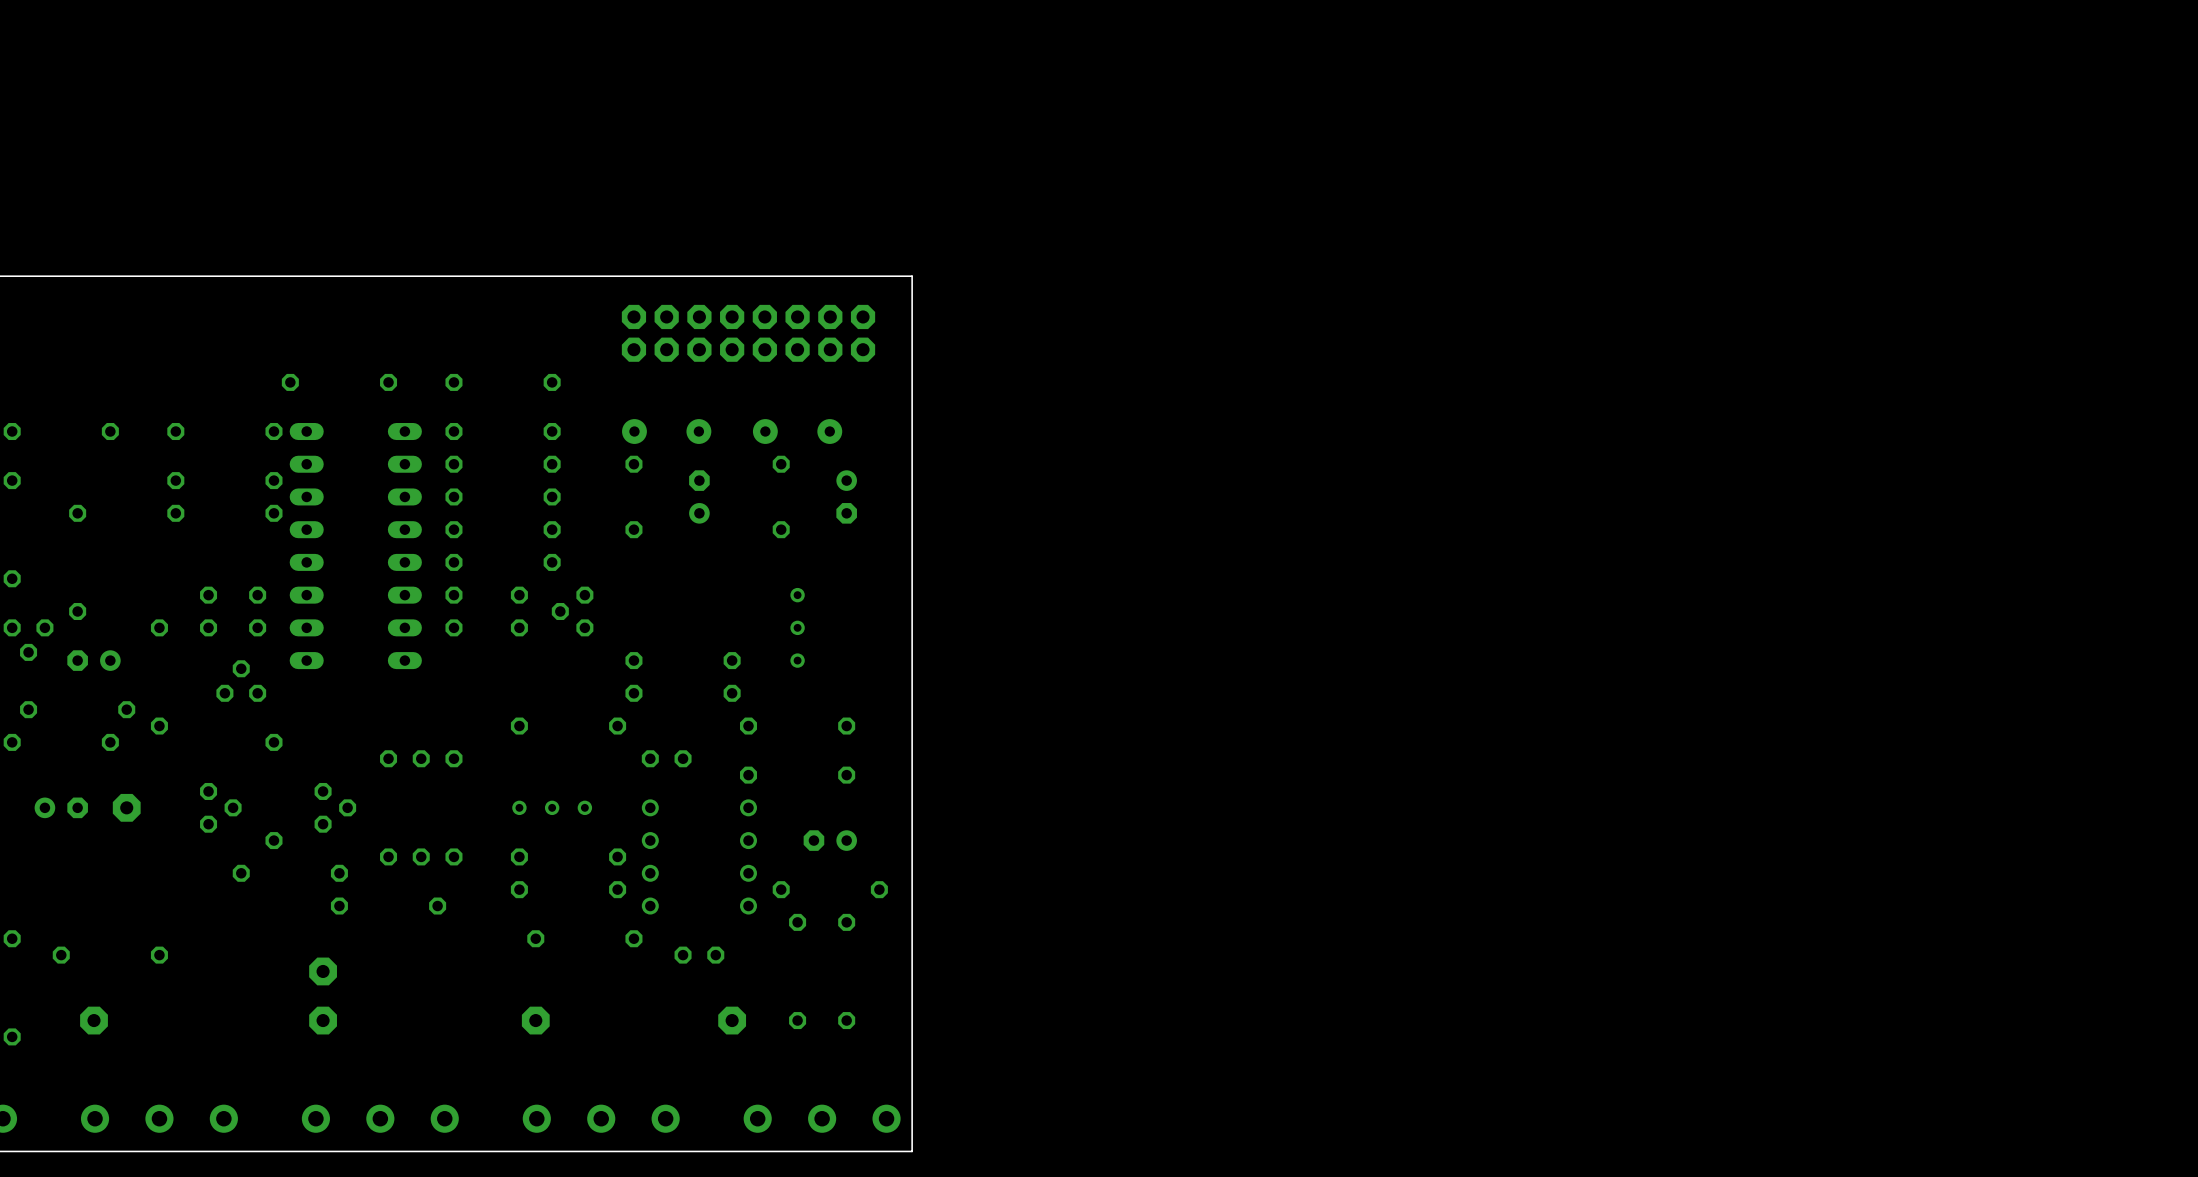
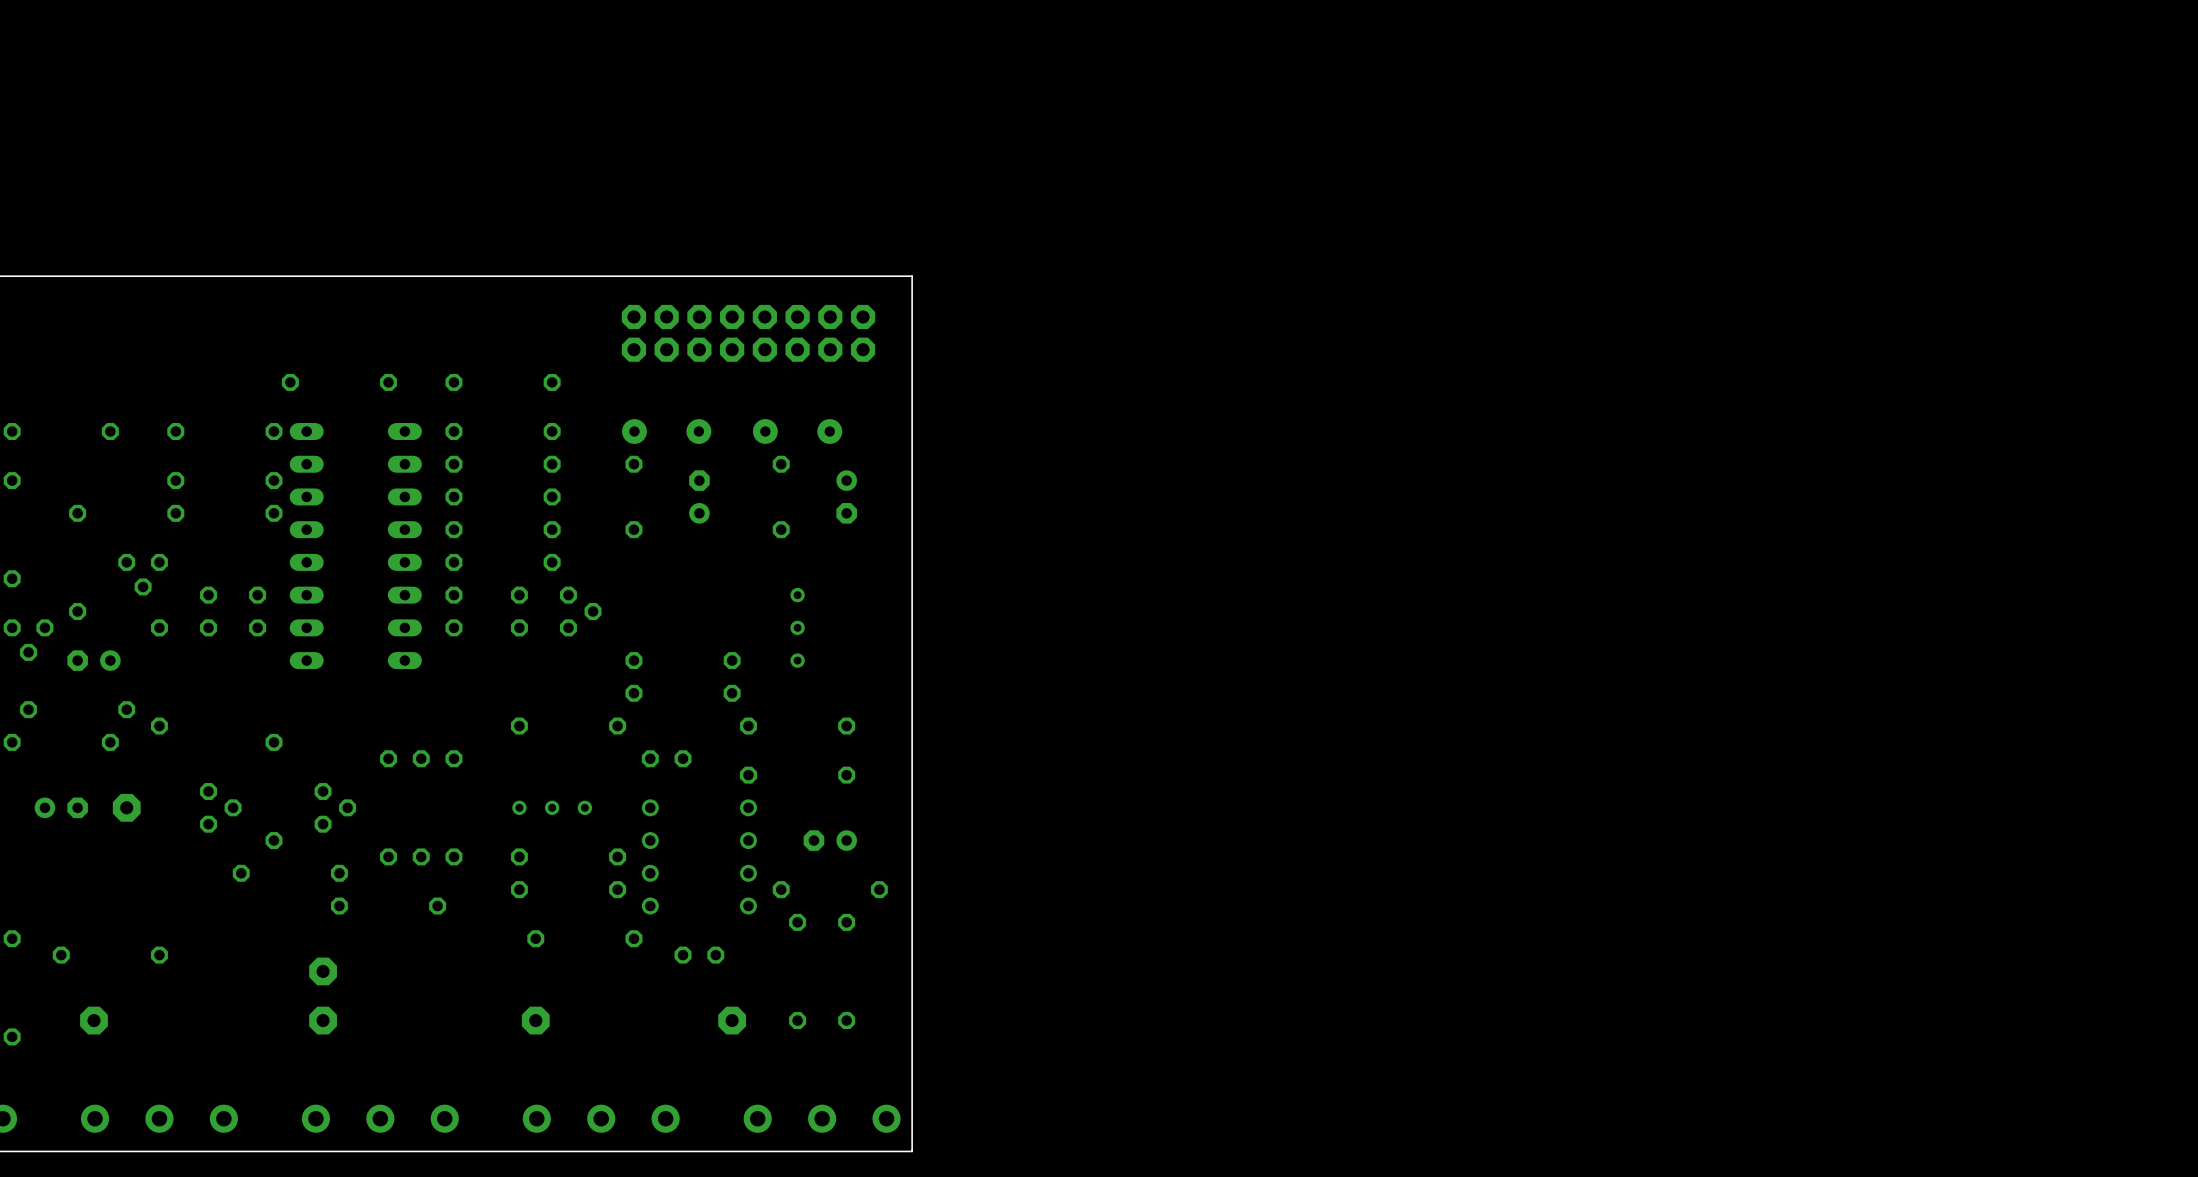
part rotation: 0° (572, 611) -> 180° (580, 611)
part rotation: 0° (241, 681) -> 180° (143, 574)
part position: (241, 681) -> (143, 574)

